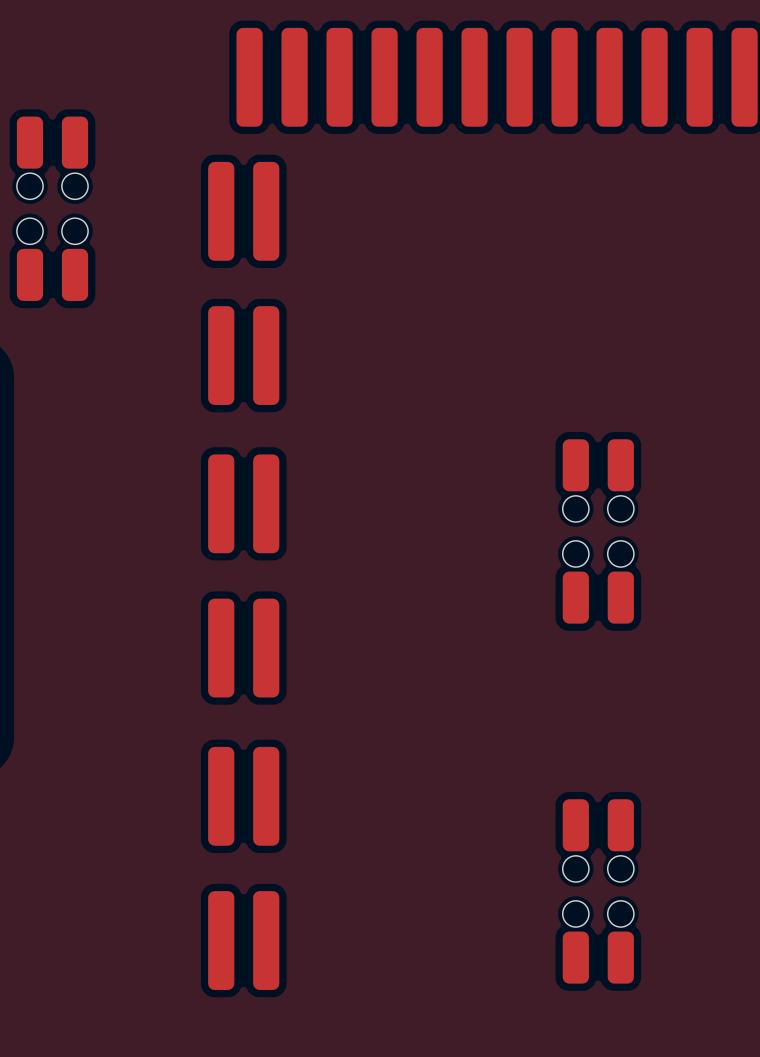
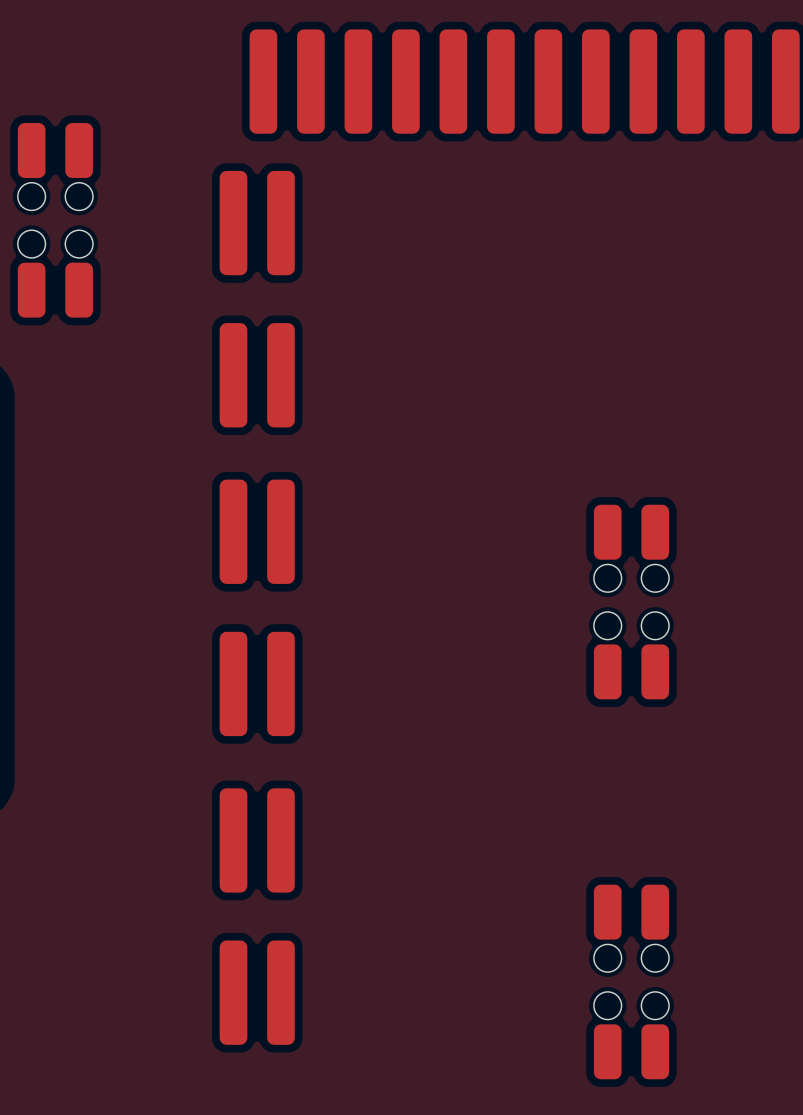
part position: (598, 531) -> (631, 602)
part position: (598, 891) -> (631, 981)

